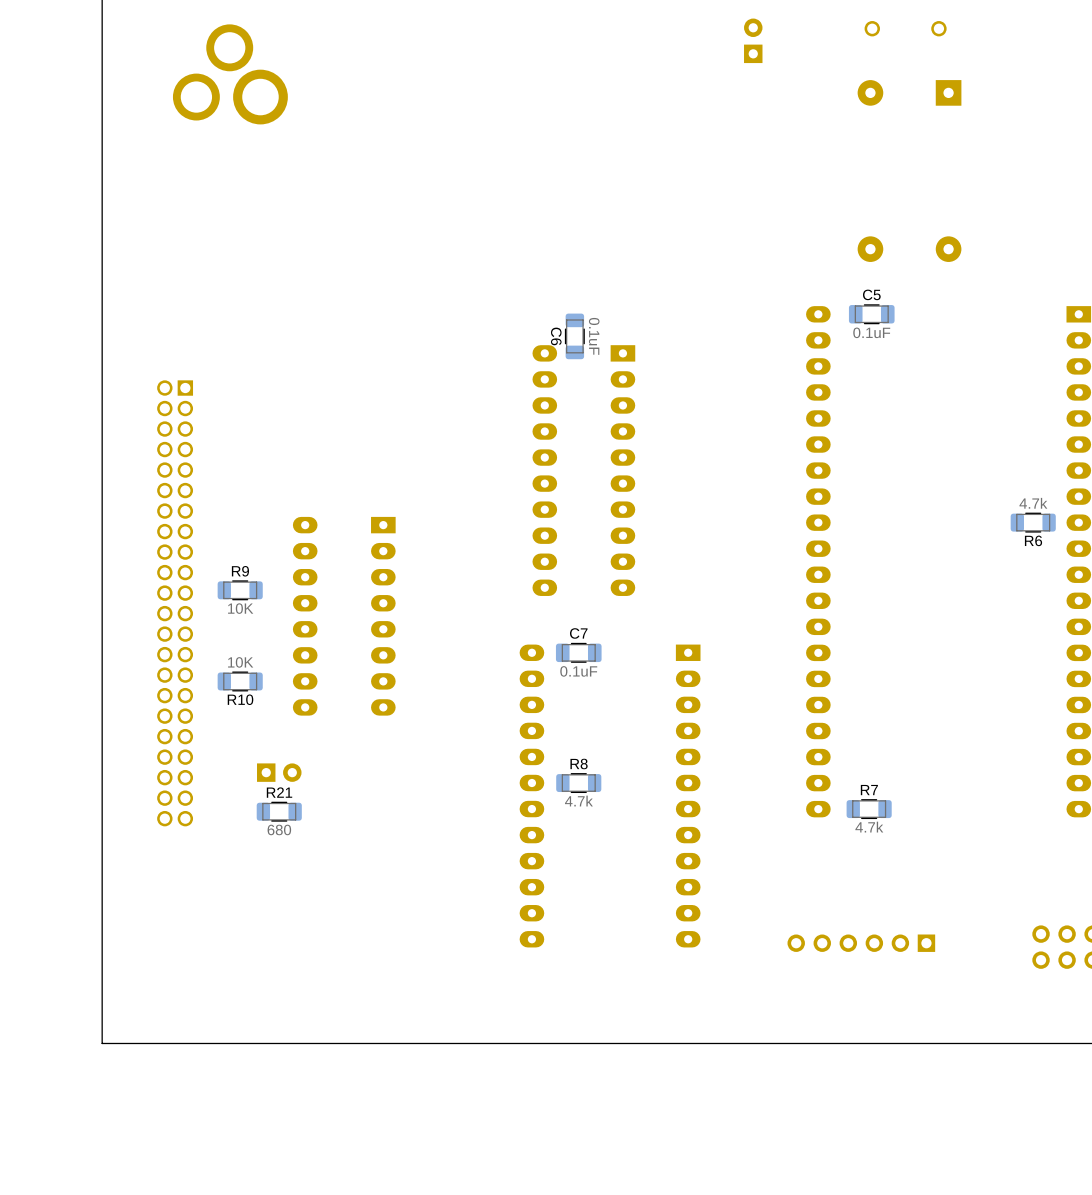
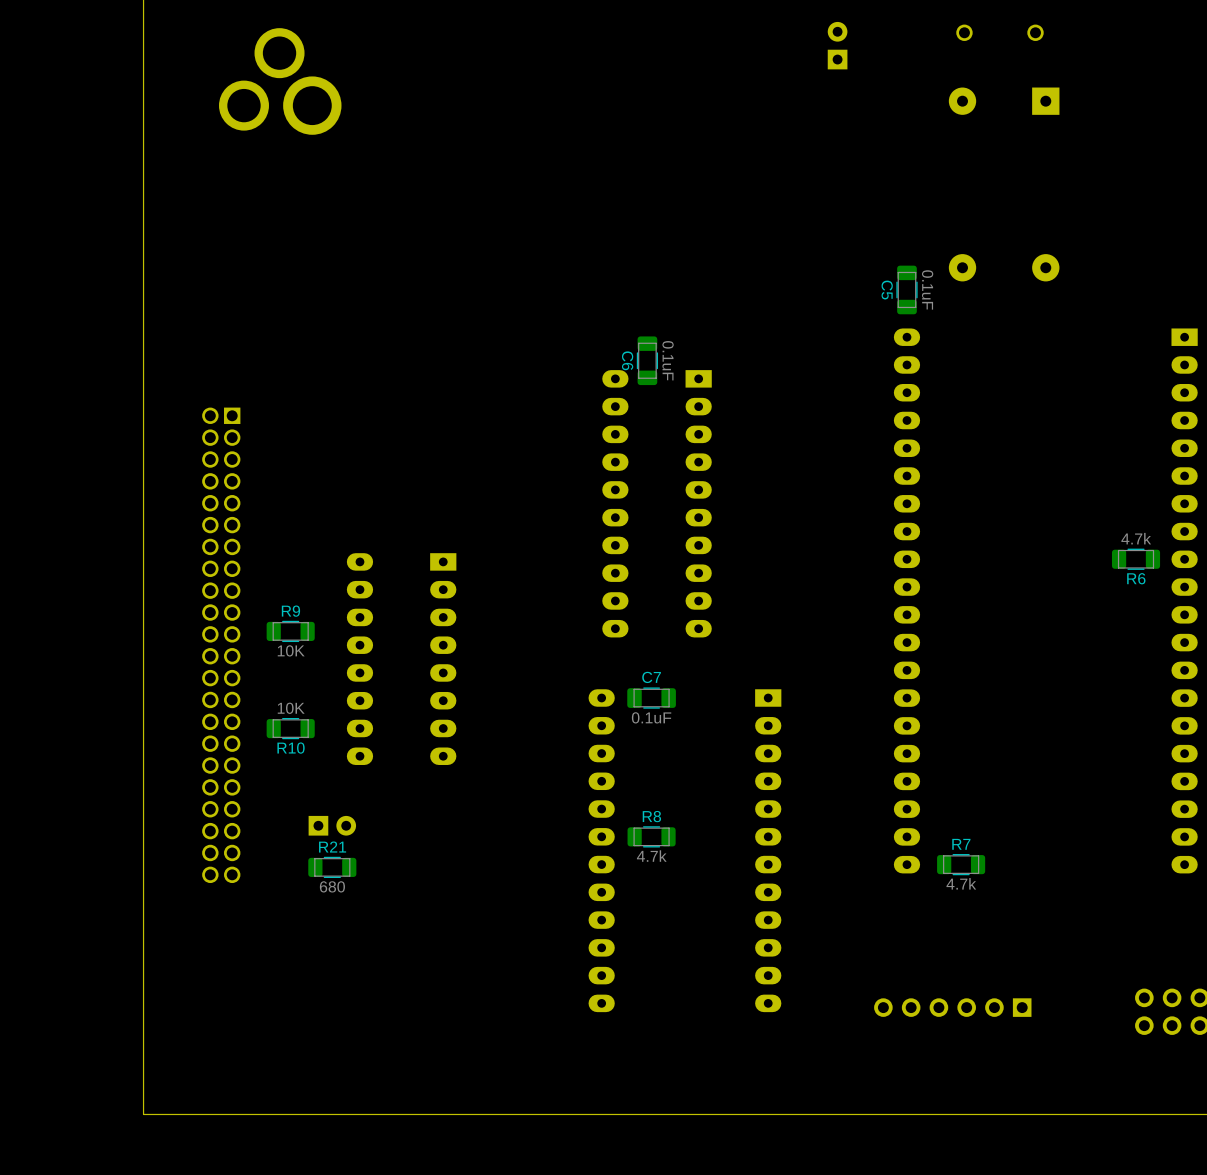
C5 name position: C5 (871, 294) -> C5 (887, 290)
C5 rotation: 0° (871, 314) -> 90° clockwise (906, 289)
C5 position: (871, 314) -> (906, 289)
C5 value position: 0.1uF (871, 332) -> 0.1uF (927, 289)

